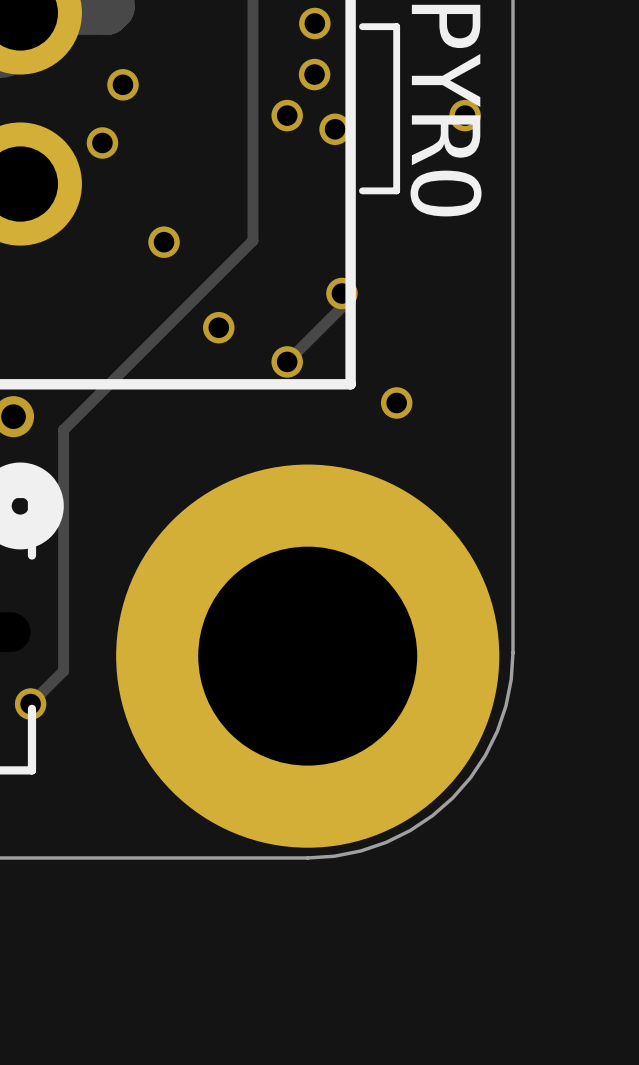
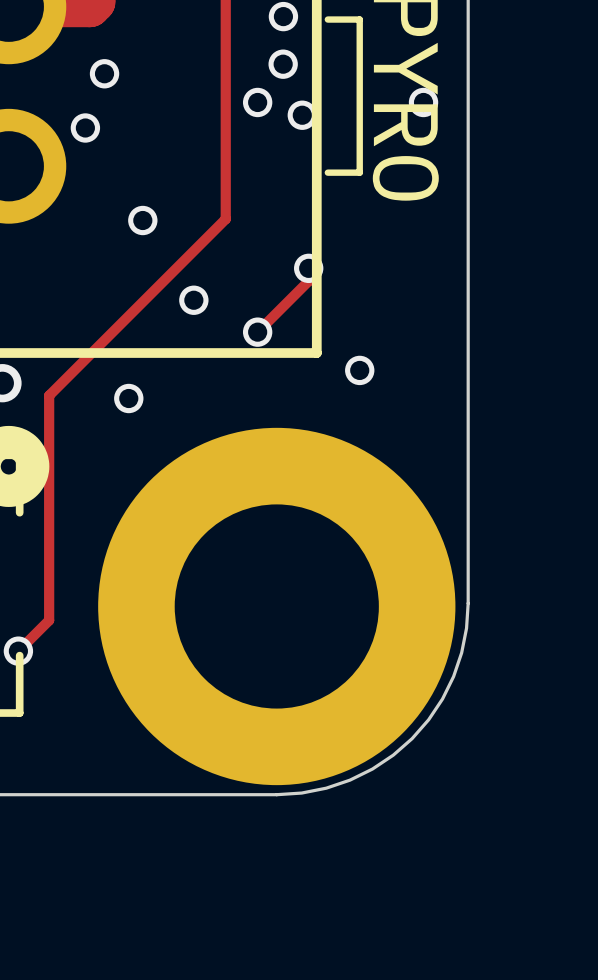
via: none -> (128, 398)

